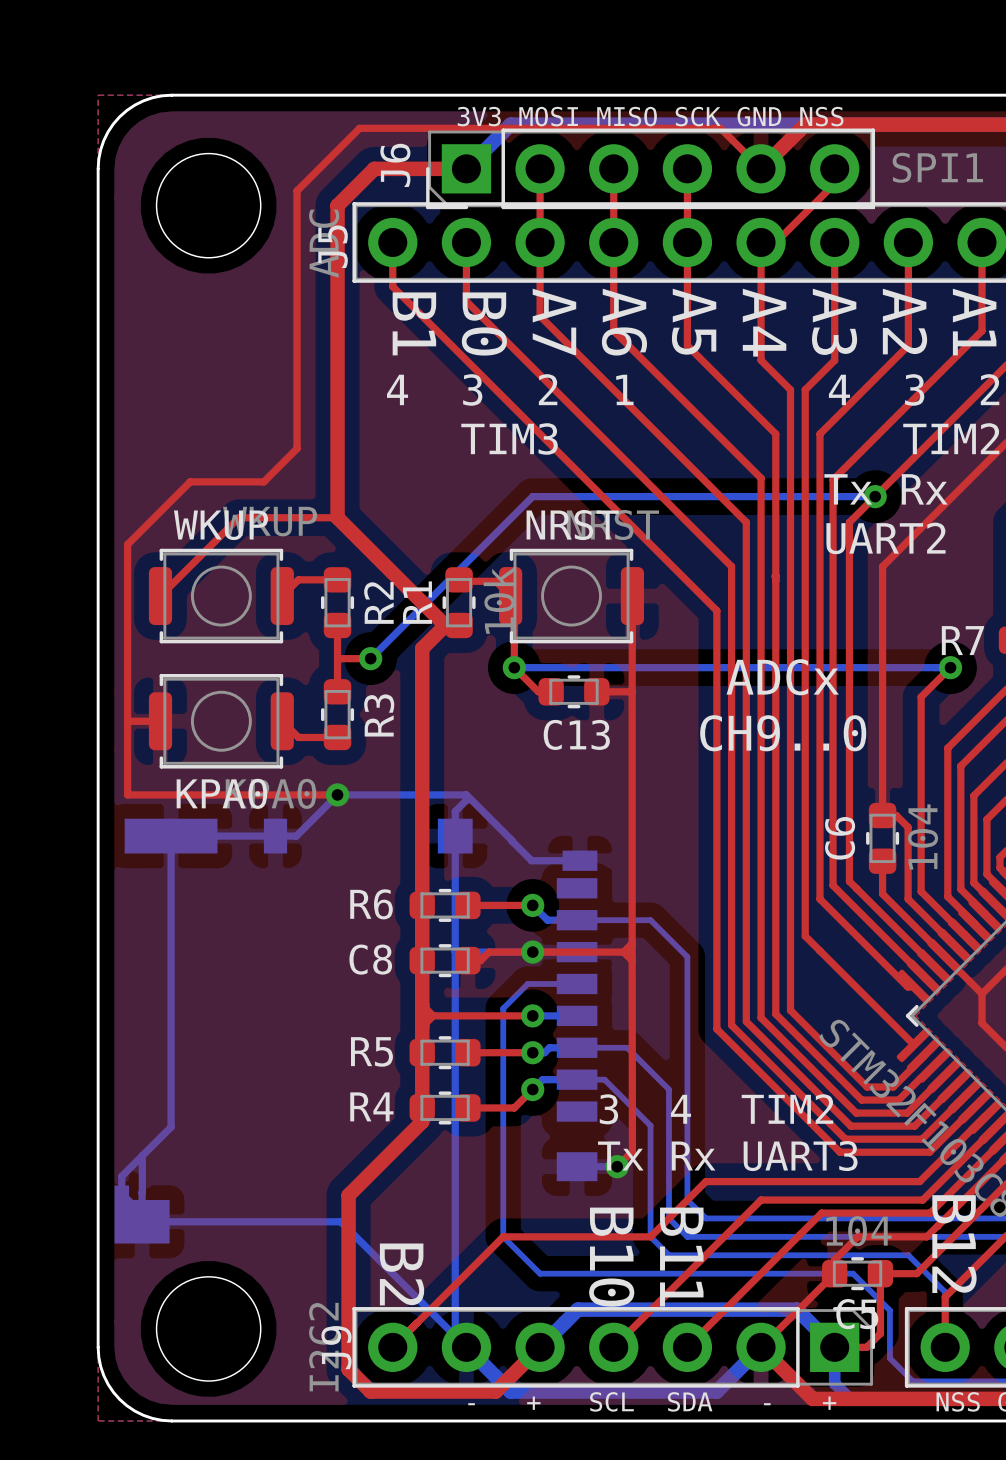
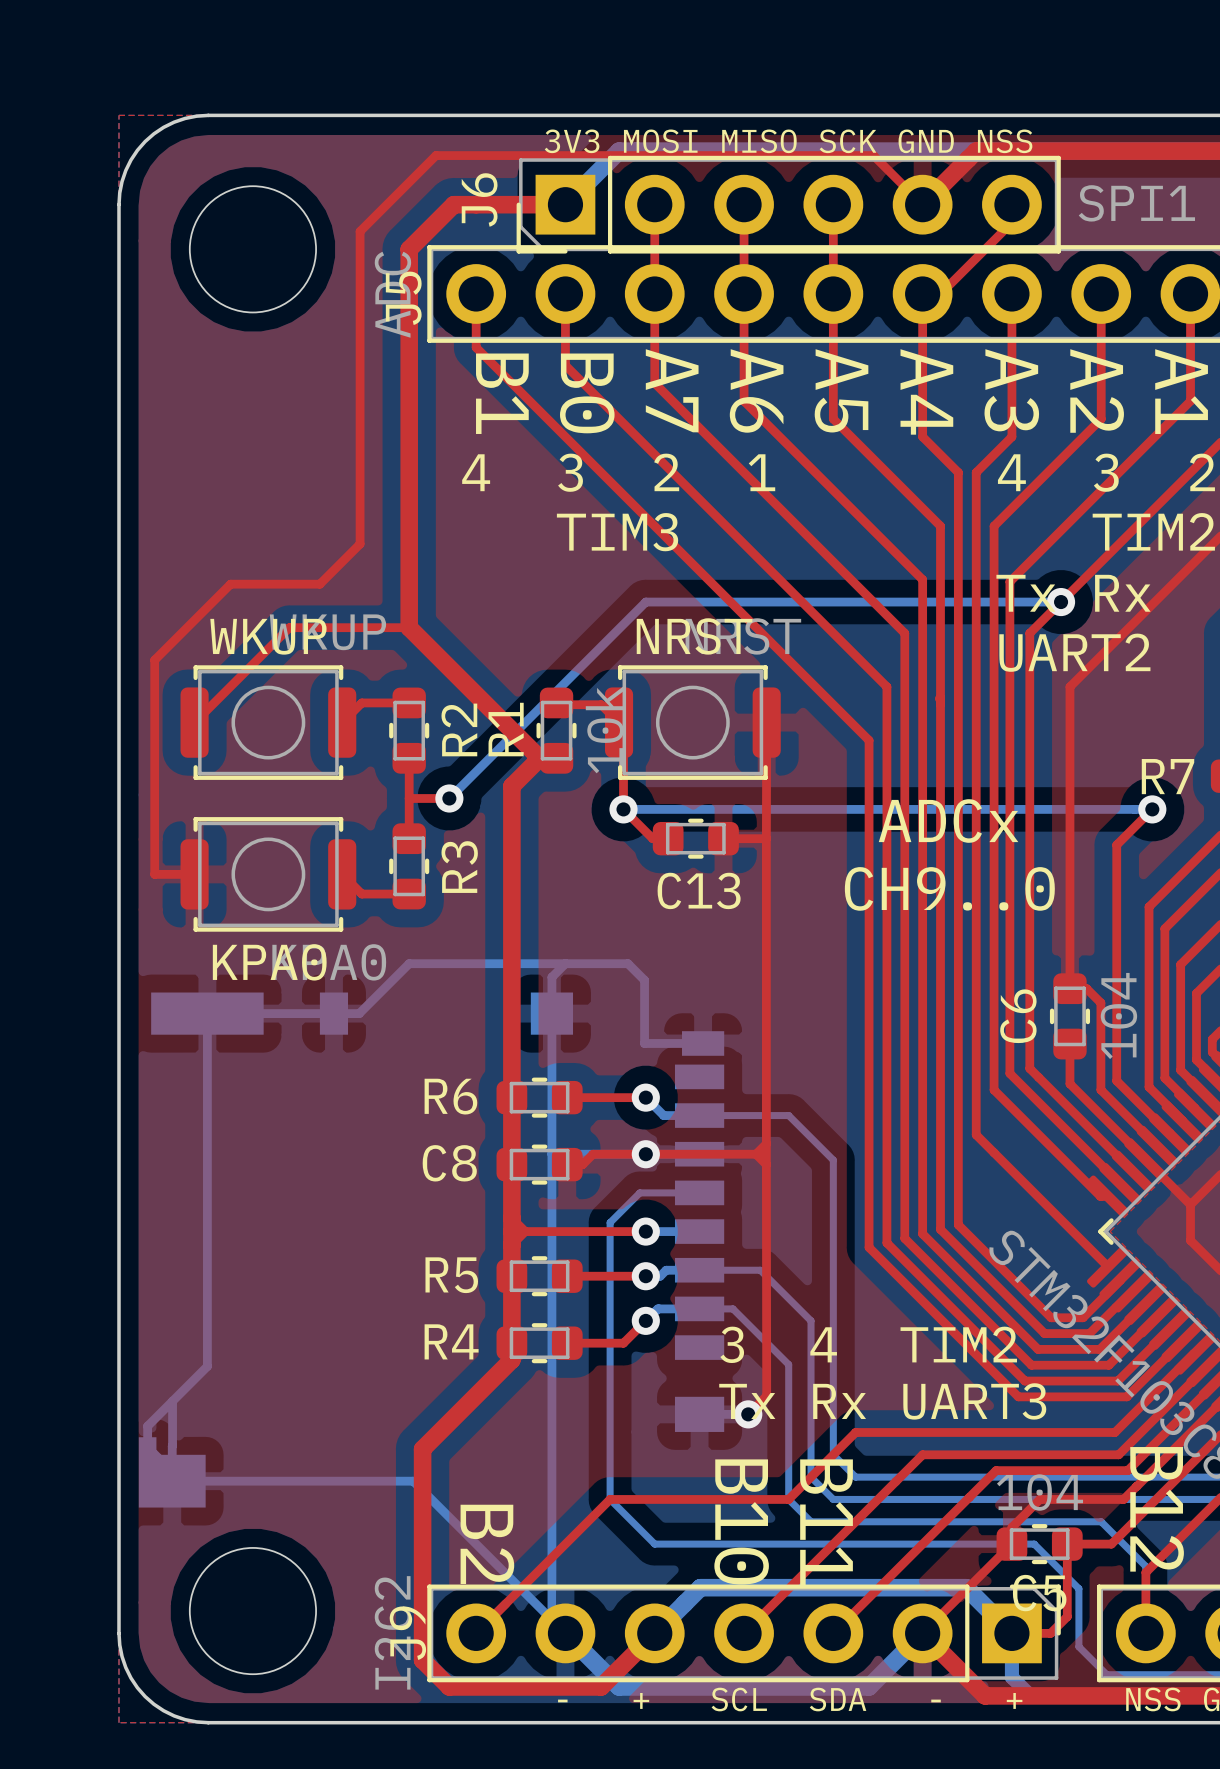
top track: (127, 721) (127, 794) (337, 794) -> none
via: (337, 794) -> none
bottom track: (455, 811) (466, 800) (466, 794) (511, 840) -> (551, 983) (551, 977) (565, 963) (627, 963) (644, 980) (644, 1043)
bottom track: (511, 840) (531, 860) -> none

